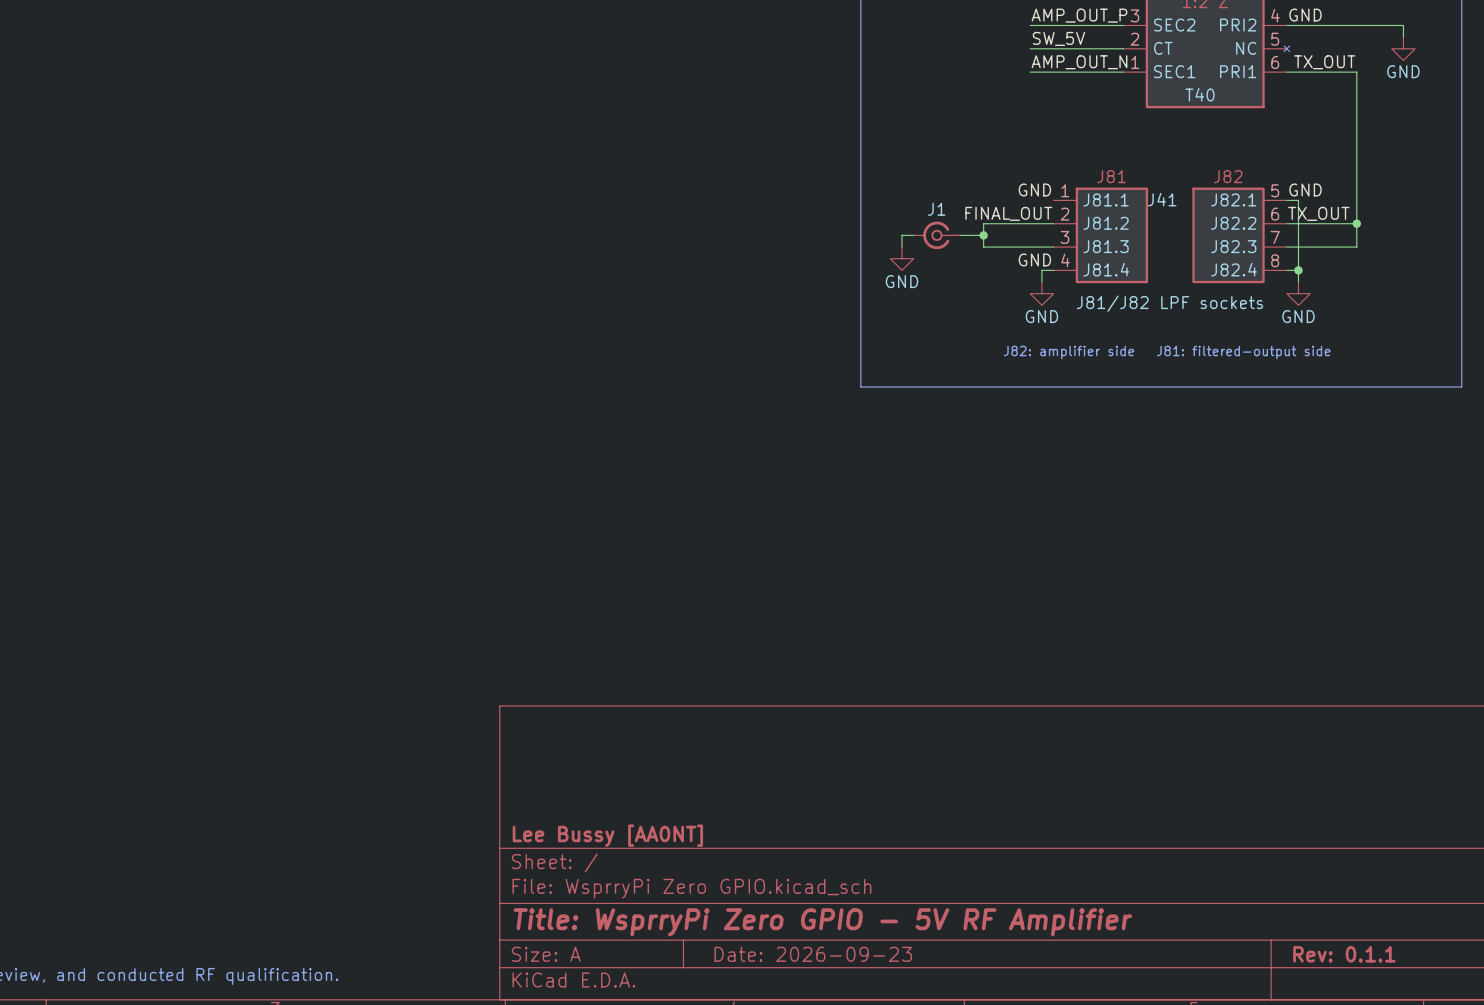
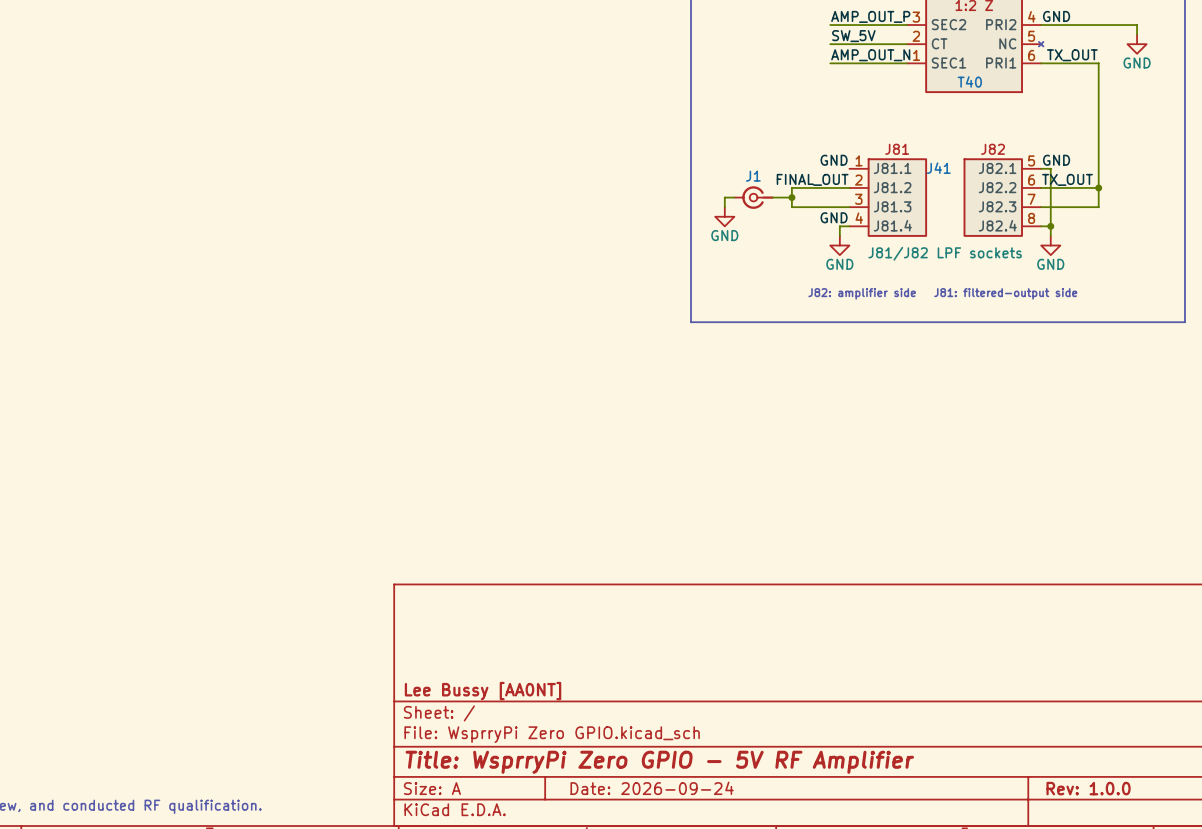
title block: Date: 2026-09-23 (813, 954) -> Date: 2026-09-24 (652, 788)
title block: Rev: 0.1.1 (1344, 954) -> Rev: 1.0.0 (1088, 788)

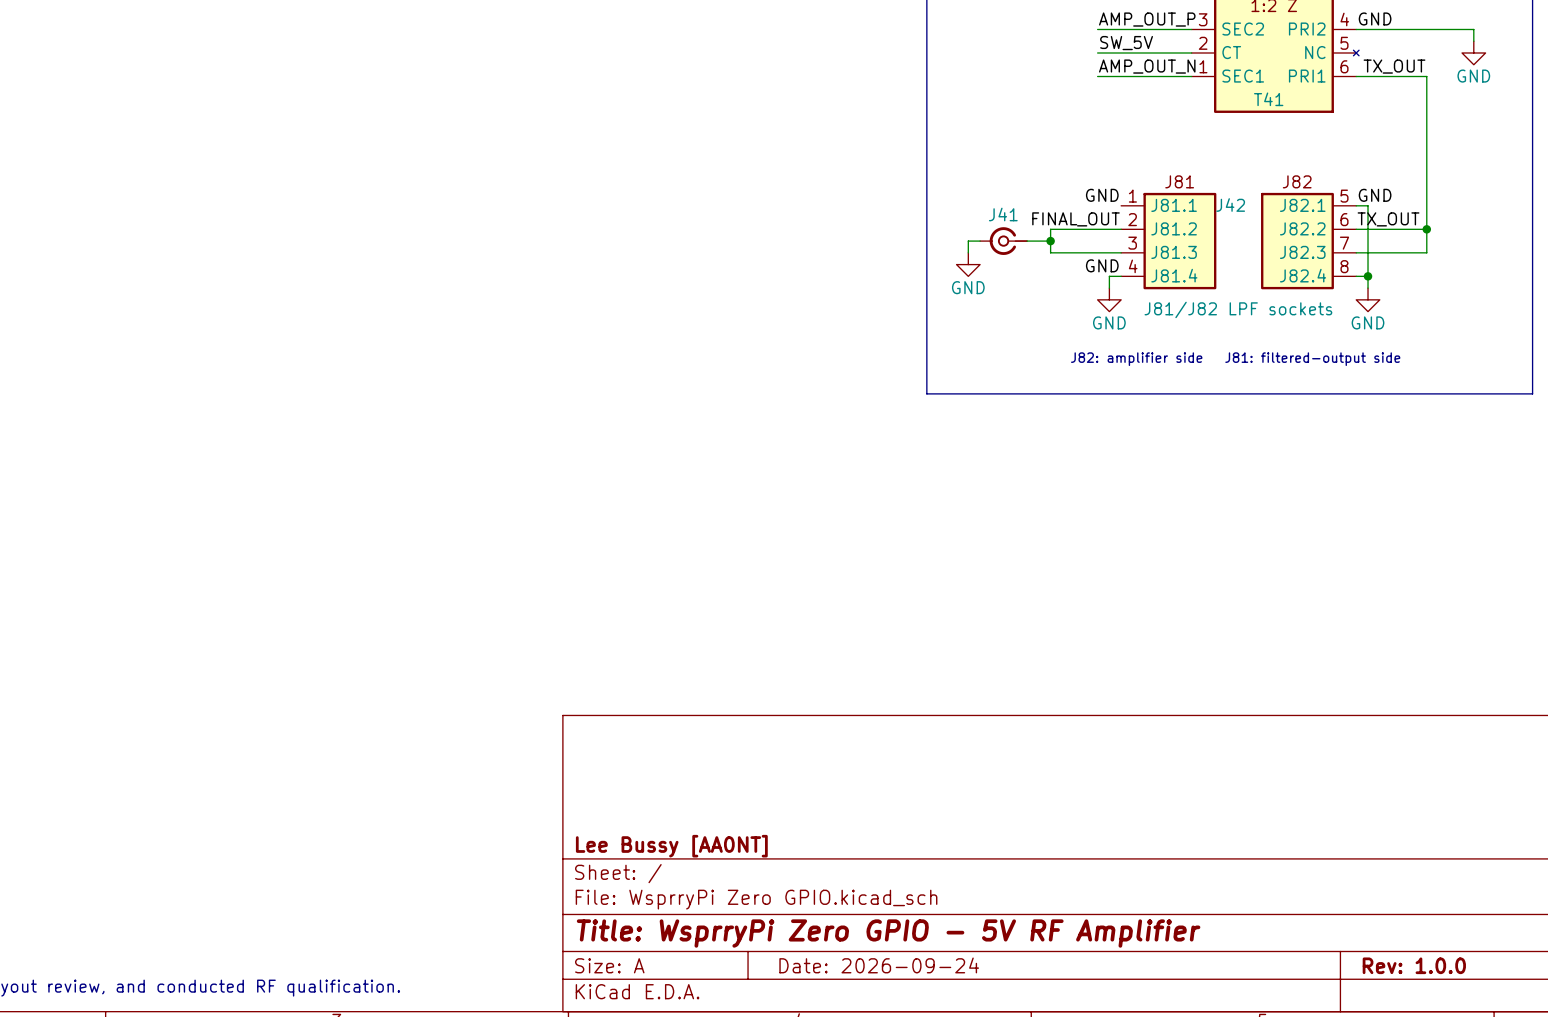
T40 name: T40 (969, 81) -> T41 (1268, 99)
J41 name: J41 (938, 168) -> J42 (1230, 205)
J1 name: J1 (753, 176) -> J41 (1003, 214)

